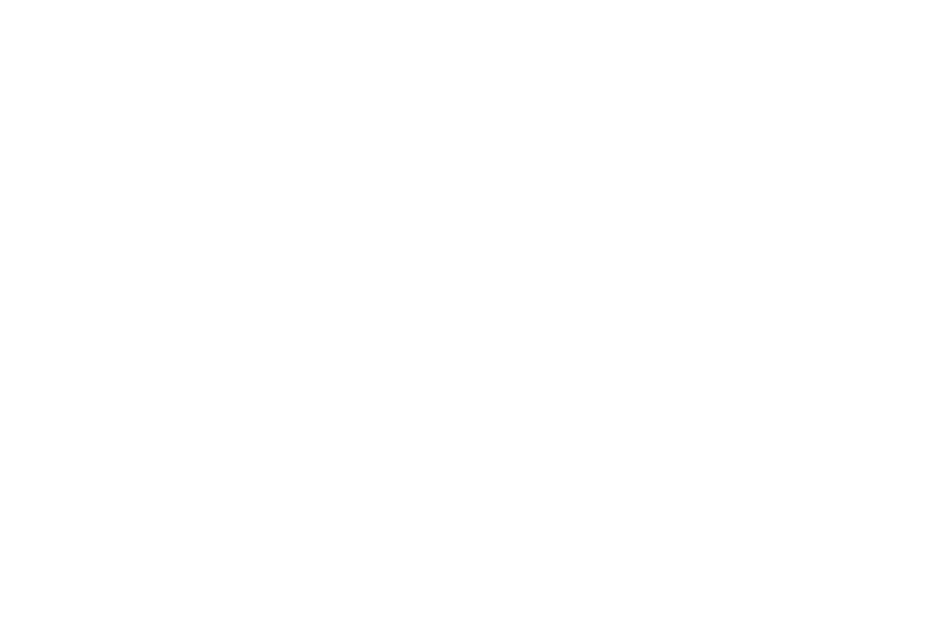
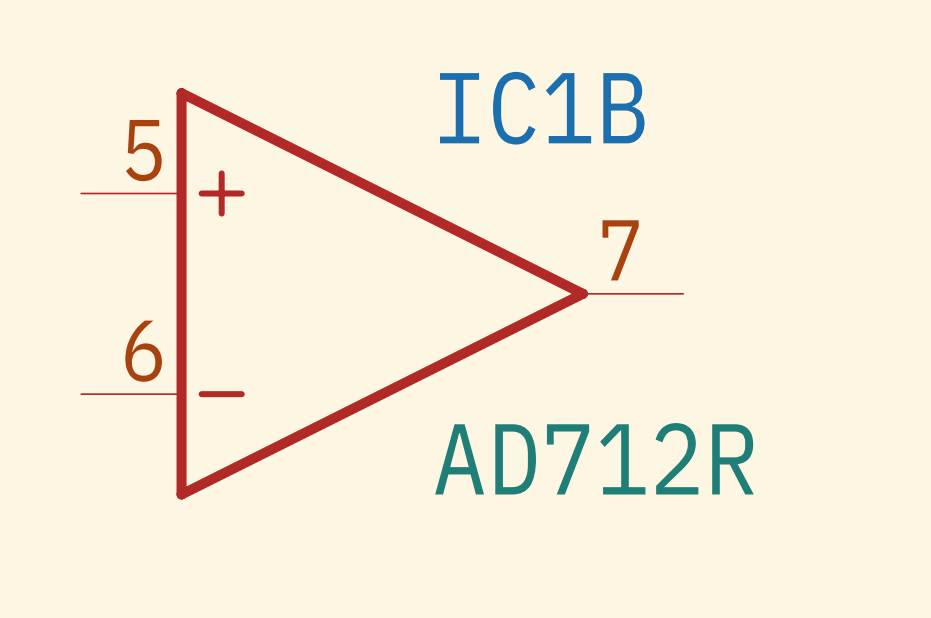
IC1B: none -> AD712R (382, 293)

